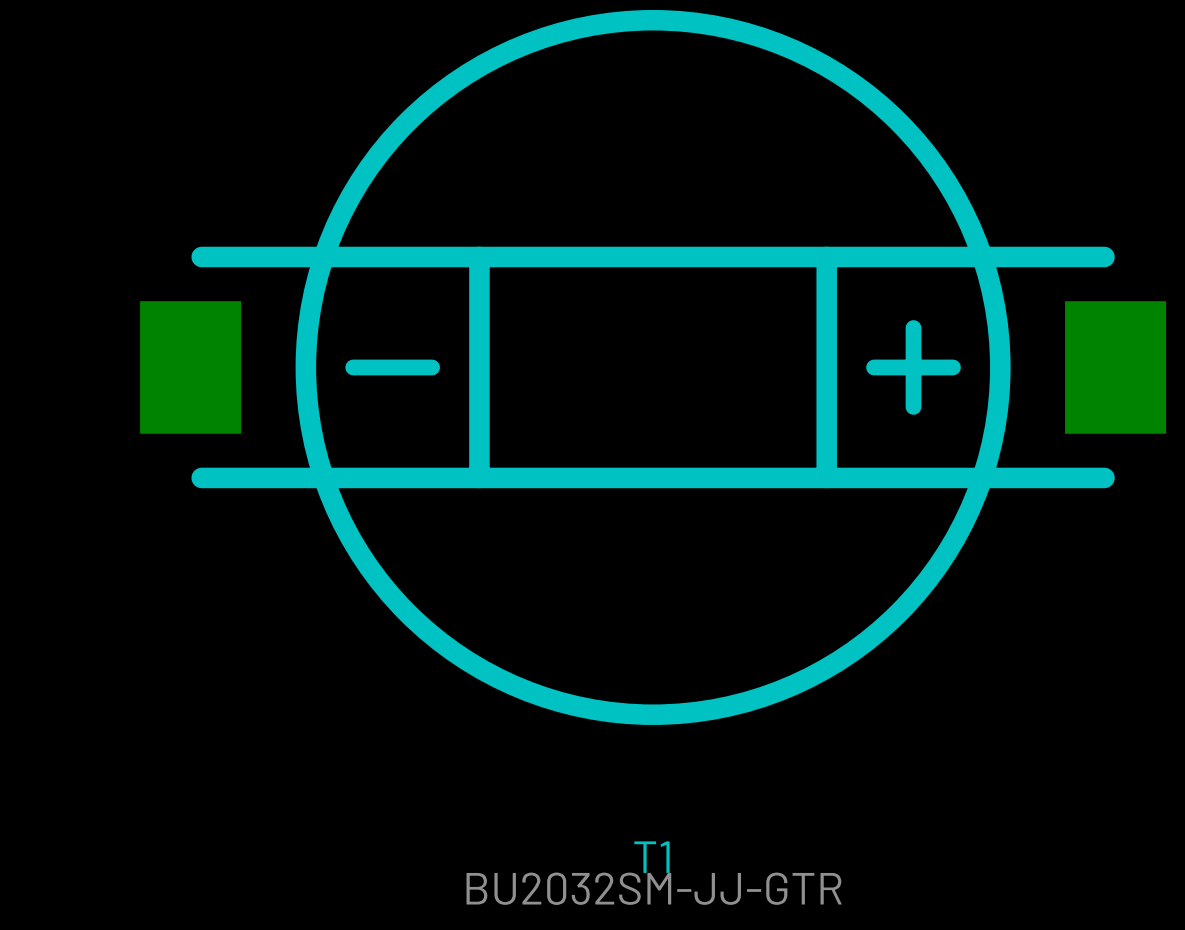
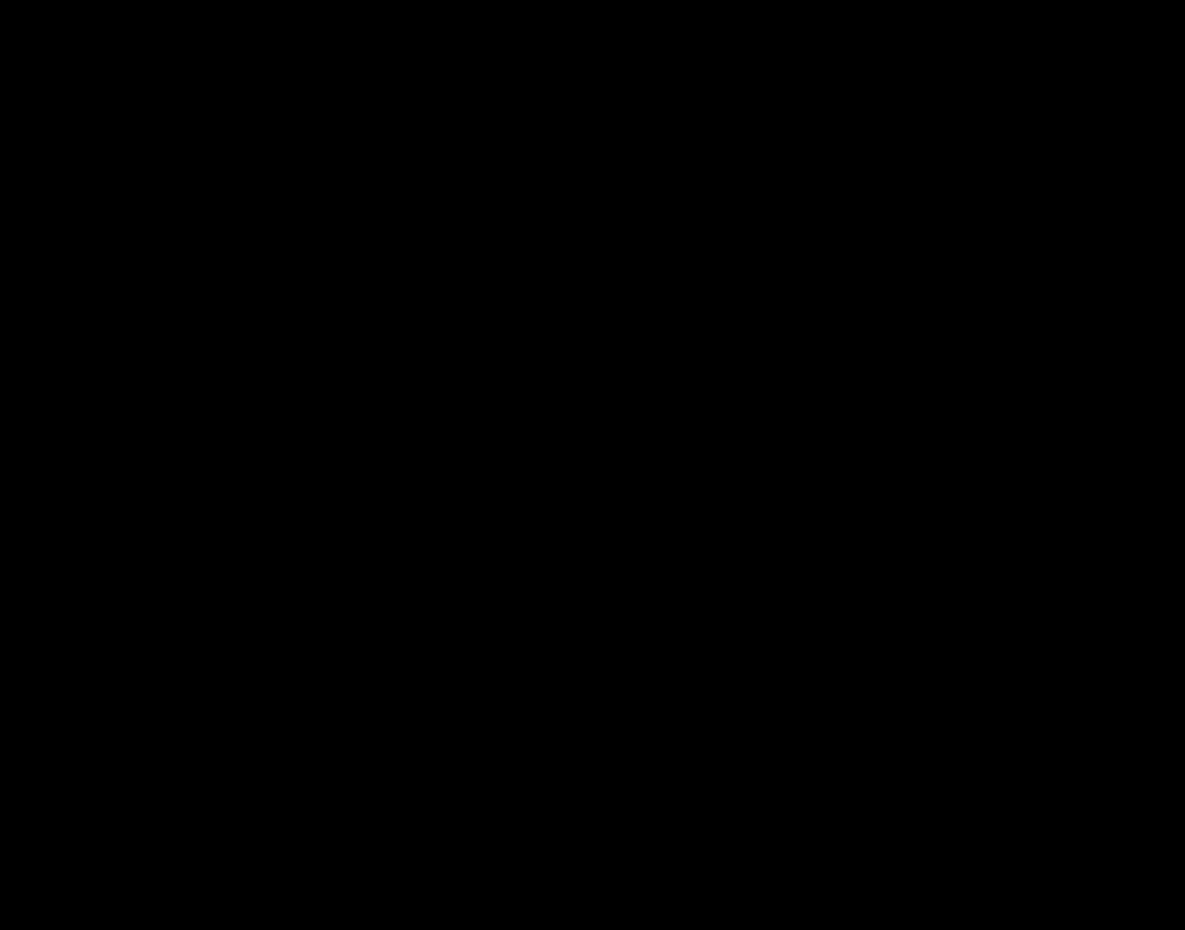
T1: BU2032SM-JJ-GTR (653, 367) -> none

